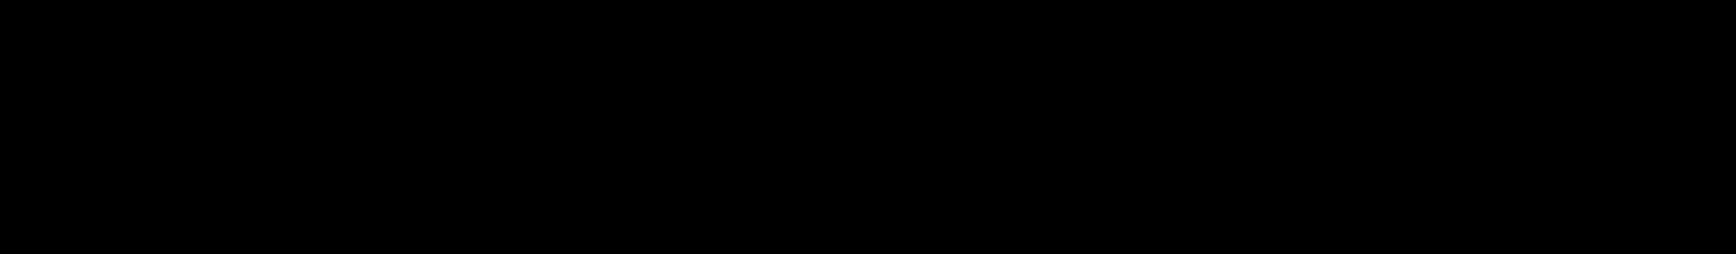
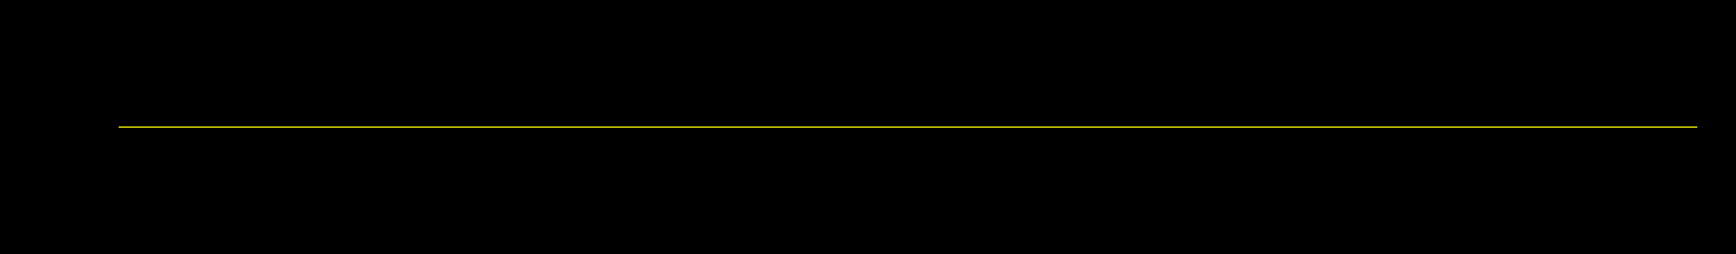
board edge: none -> (1696, 127) (119, 127)

